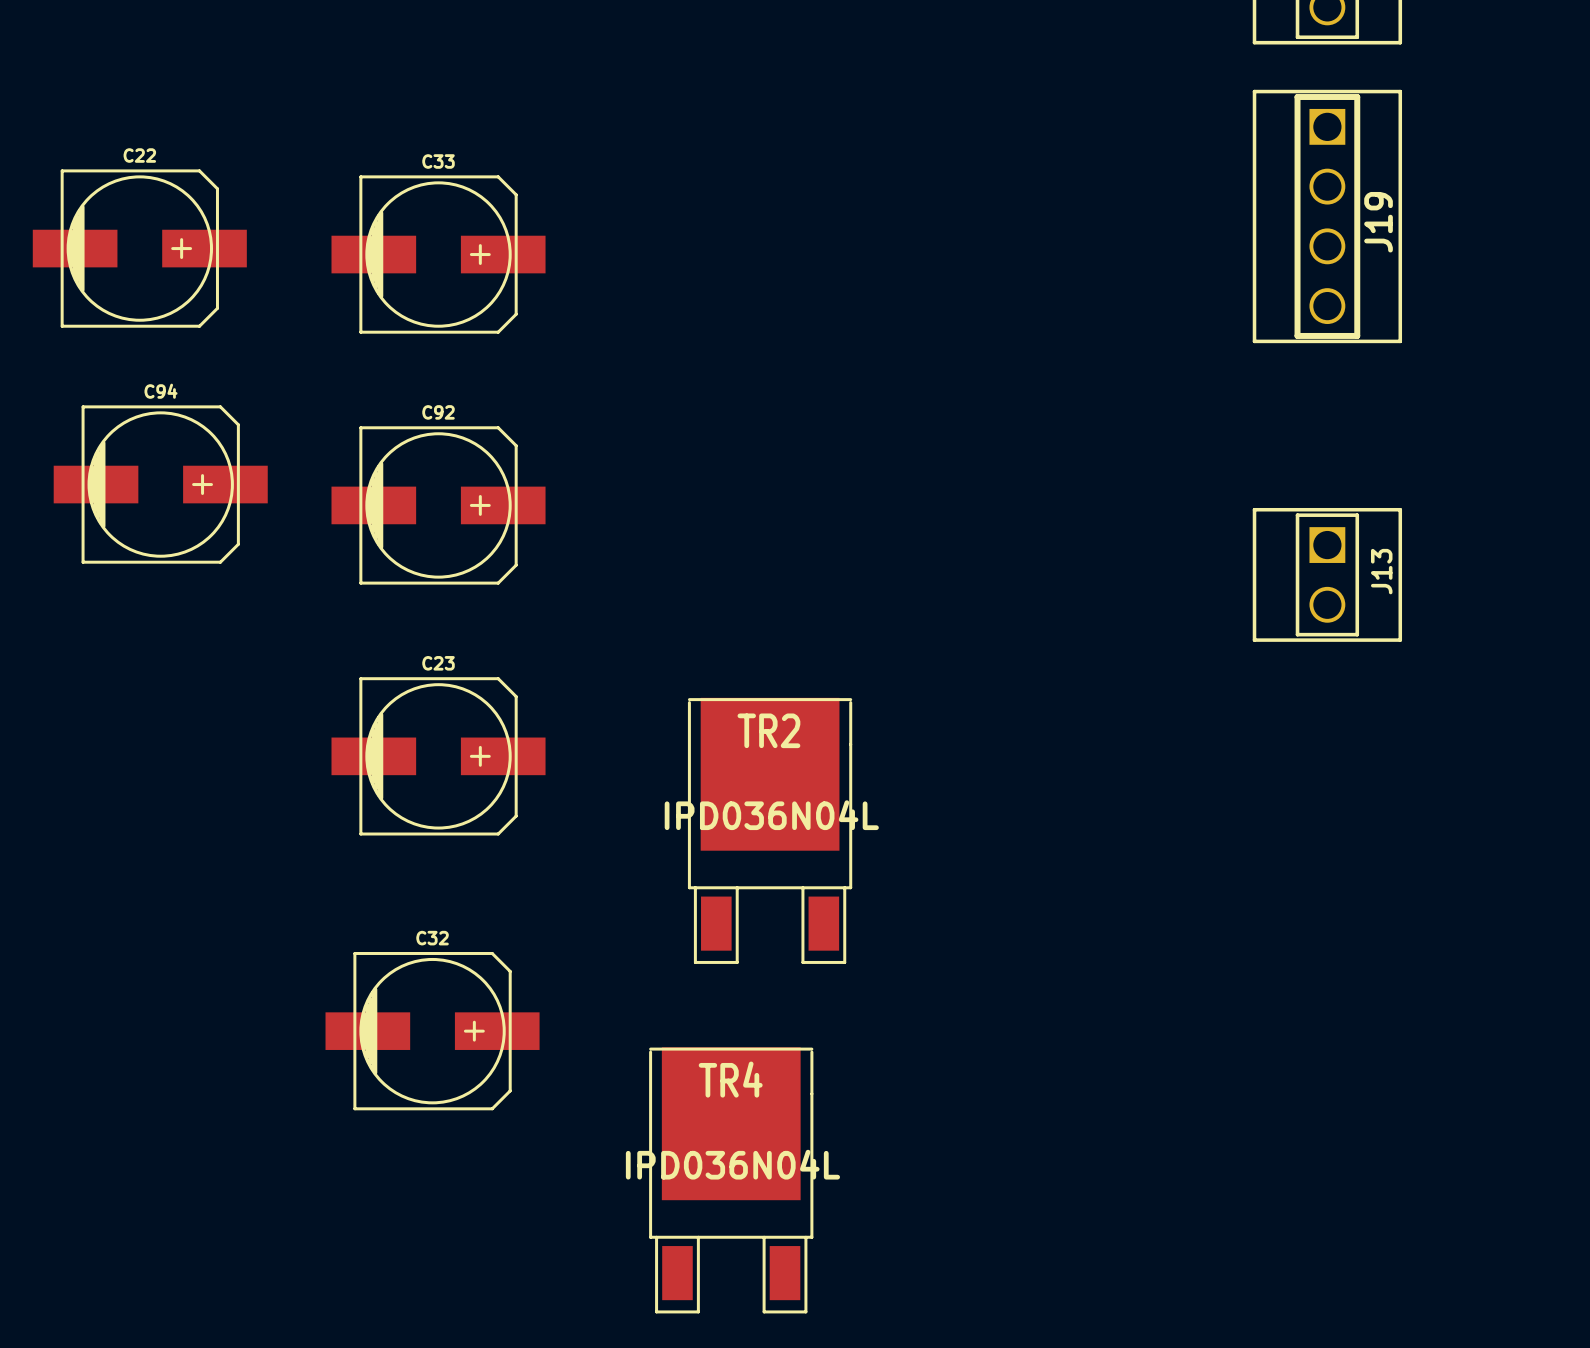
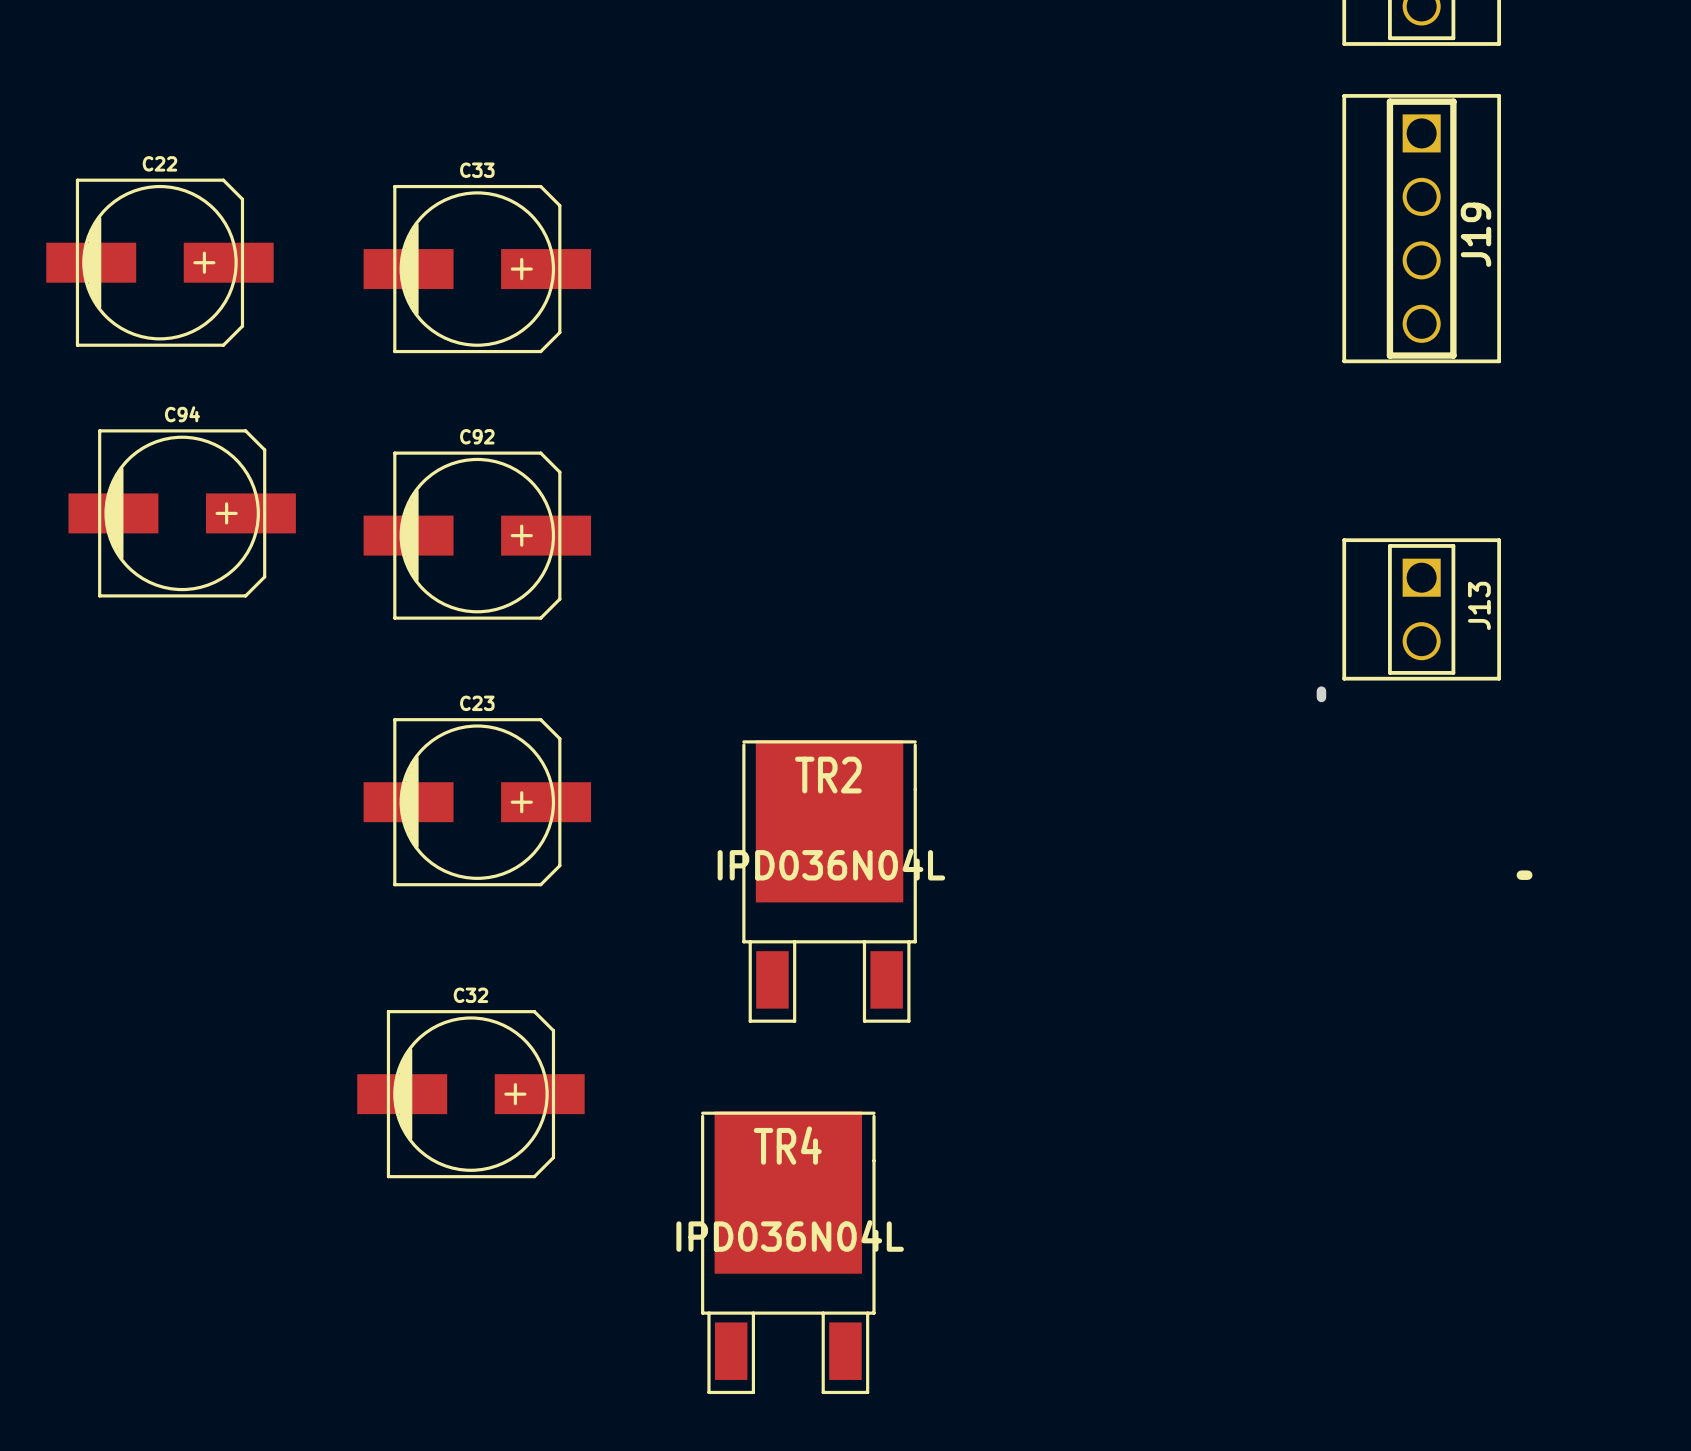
board edge: none -> (1321, 691) (1321, 697)
line: none -> (1521, 875) (1527, 875)

